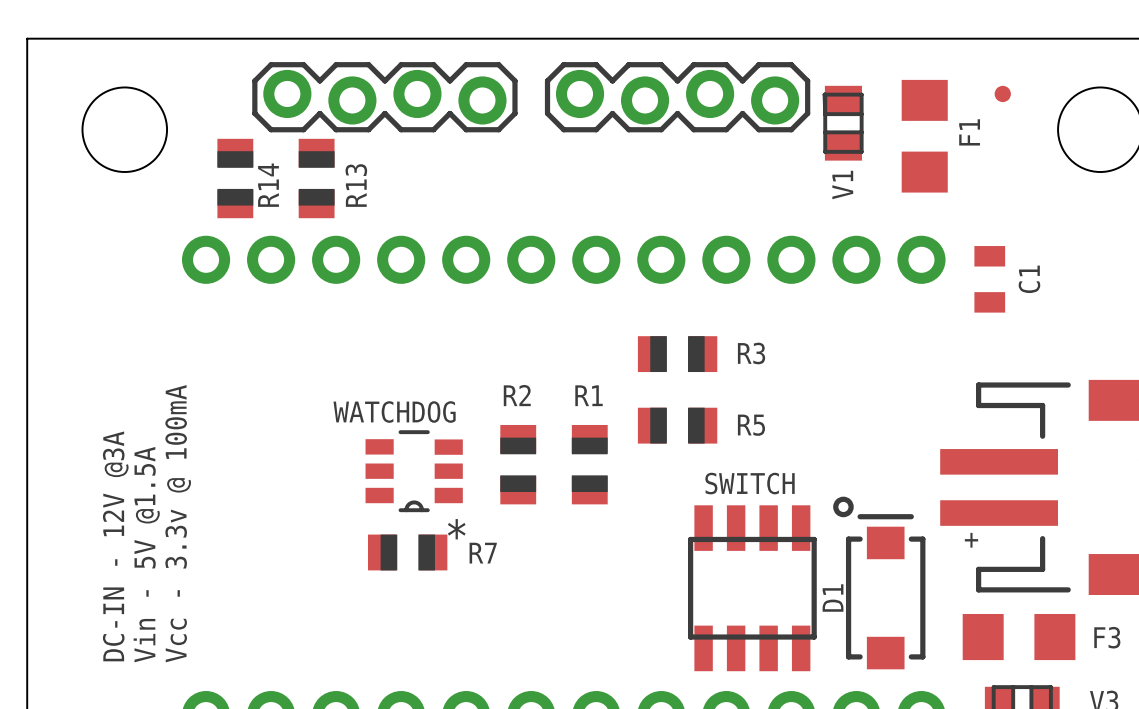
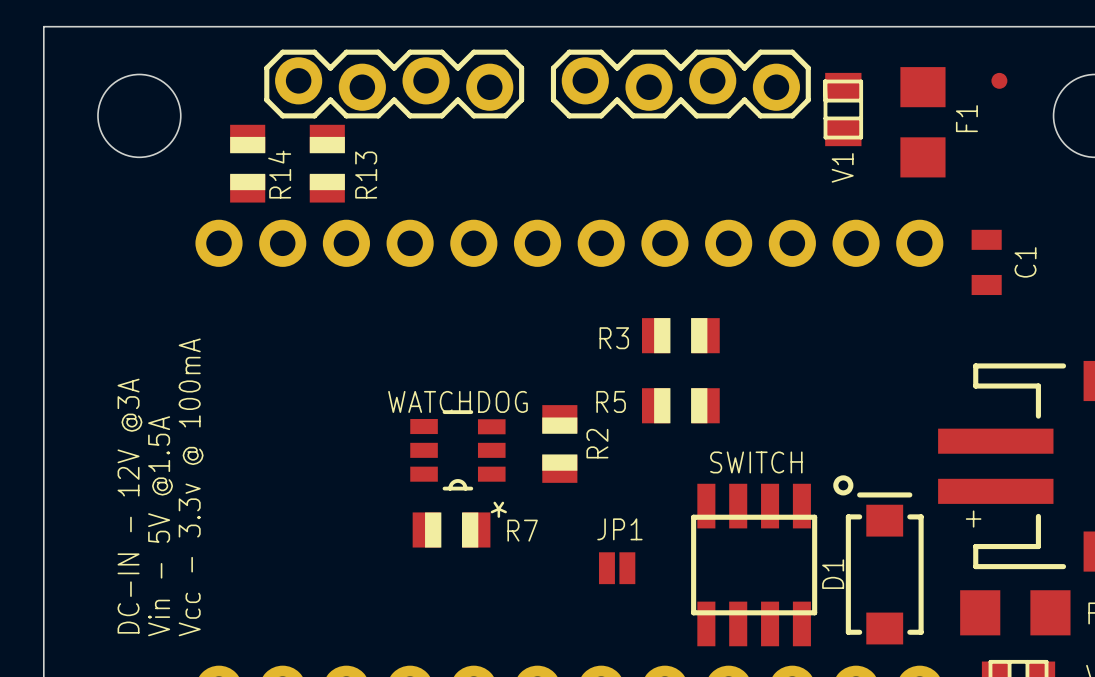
R3 name position: R3 (751, 353) -> R3 (614, 338)
R2 name rotation: 0° (517, 395) -> 90° counterclockwise (597, 443)
R2 name position: R2 (517, 395) -> R2 (597, 443)
WATCHDOG name position: WATCHDOG (394, 412) -> WATCHDOG (457, 401)
R5 name position: R5 (751, 425) -> R5 (611, 401)
R2 position: (518, 464) -> (559, 443)
R1: (589, 464) -> none
WATCHDOG position: (414, 471) -> (457, 450)
R7 position: (407, 552) -> (451, 530)
JP1: none -> (617, 568)

